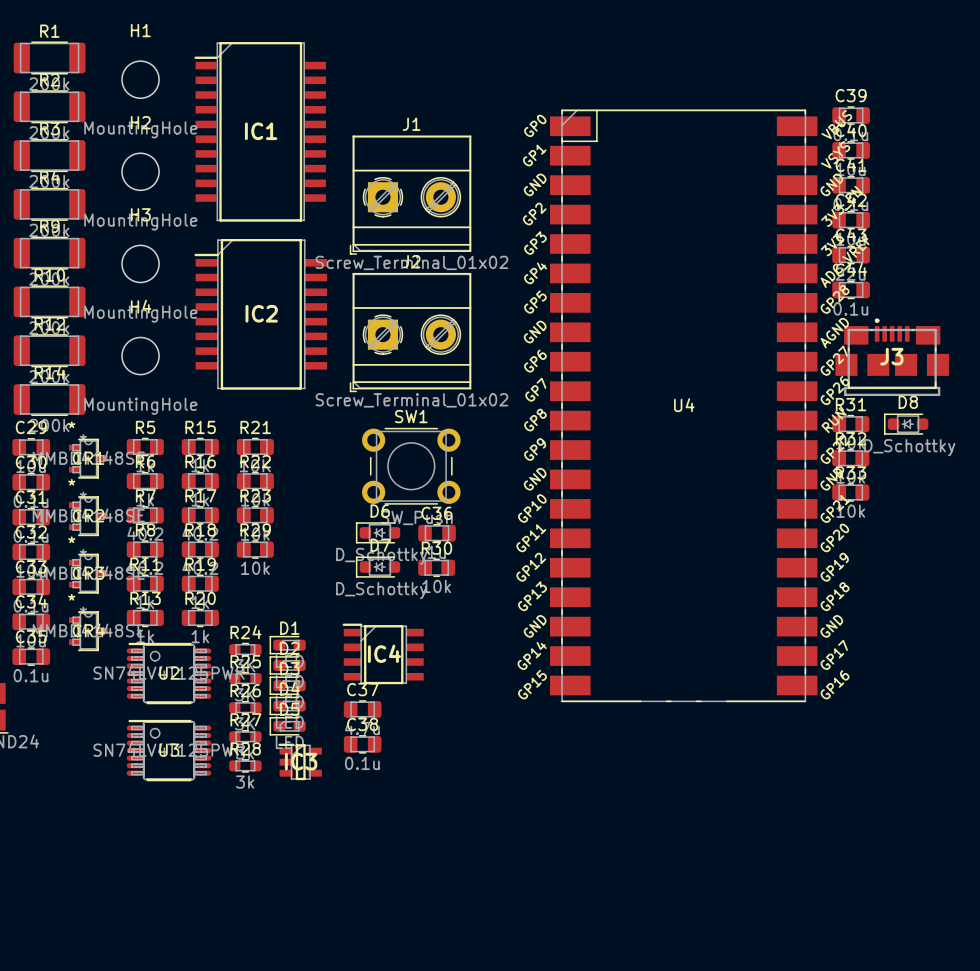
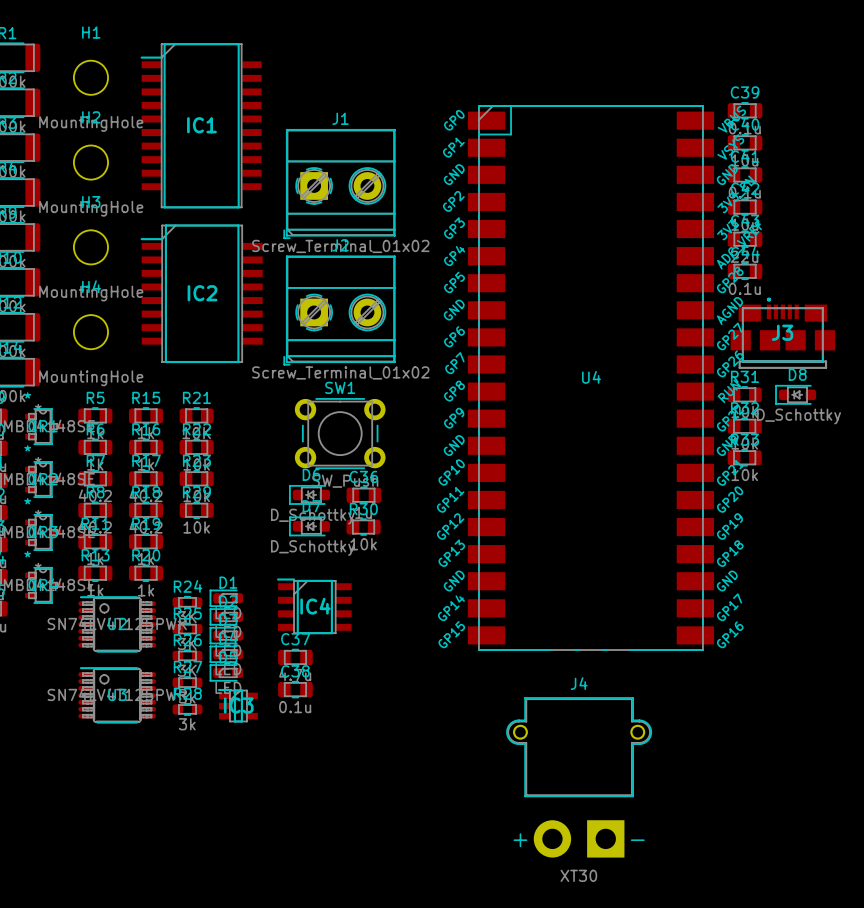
J4: none -> XT30 (579, 777)

